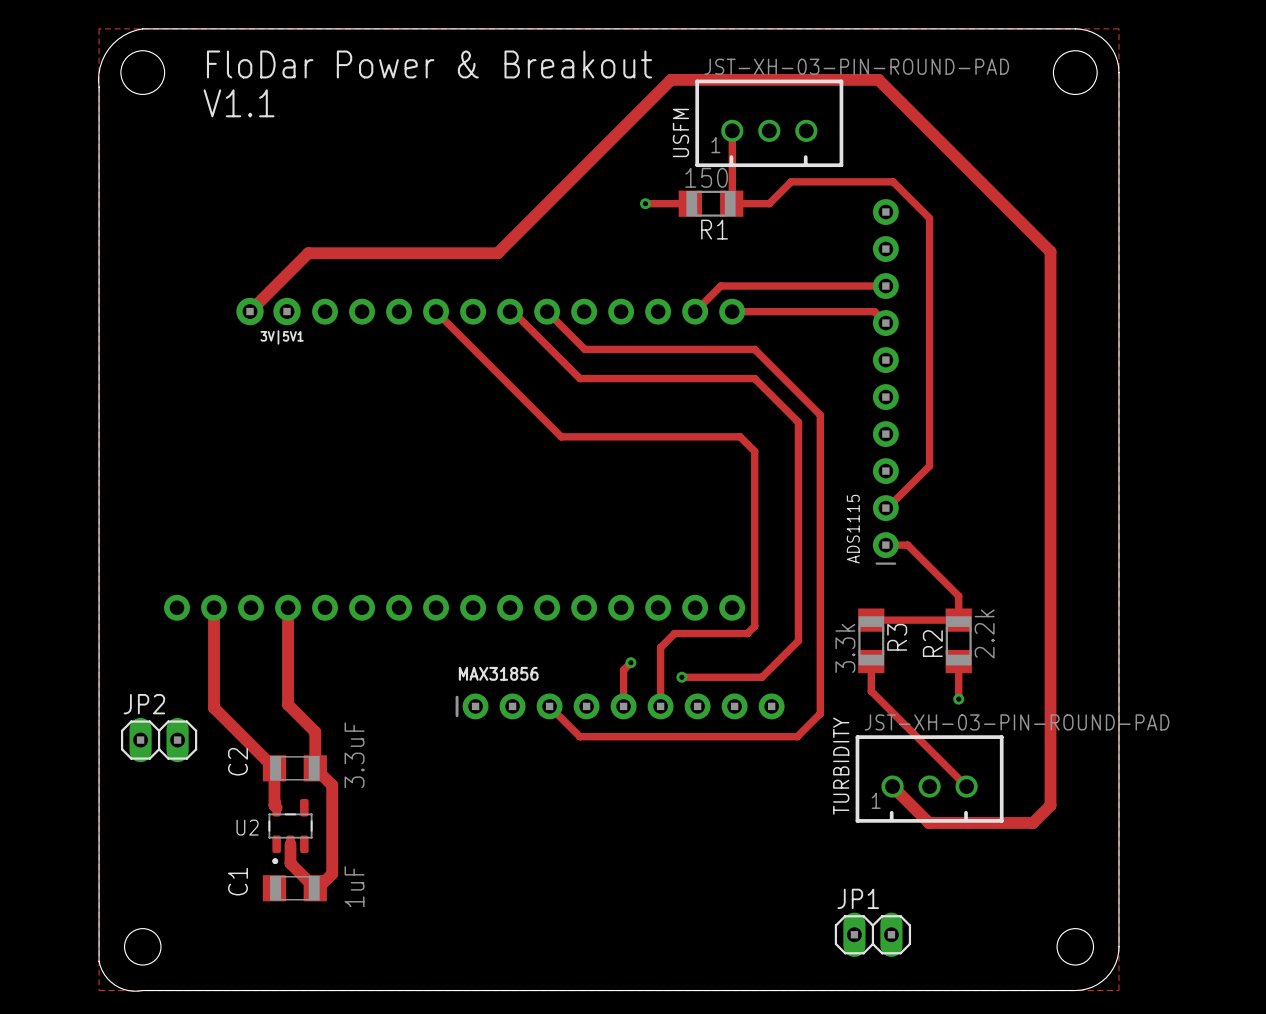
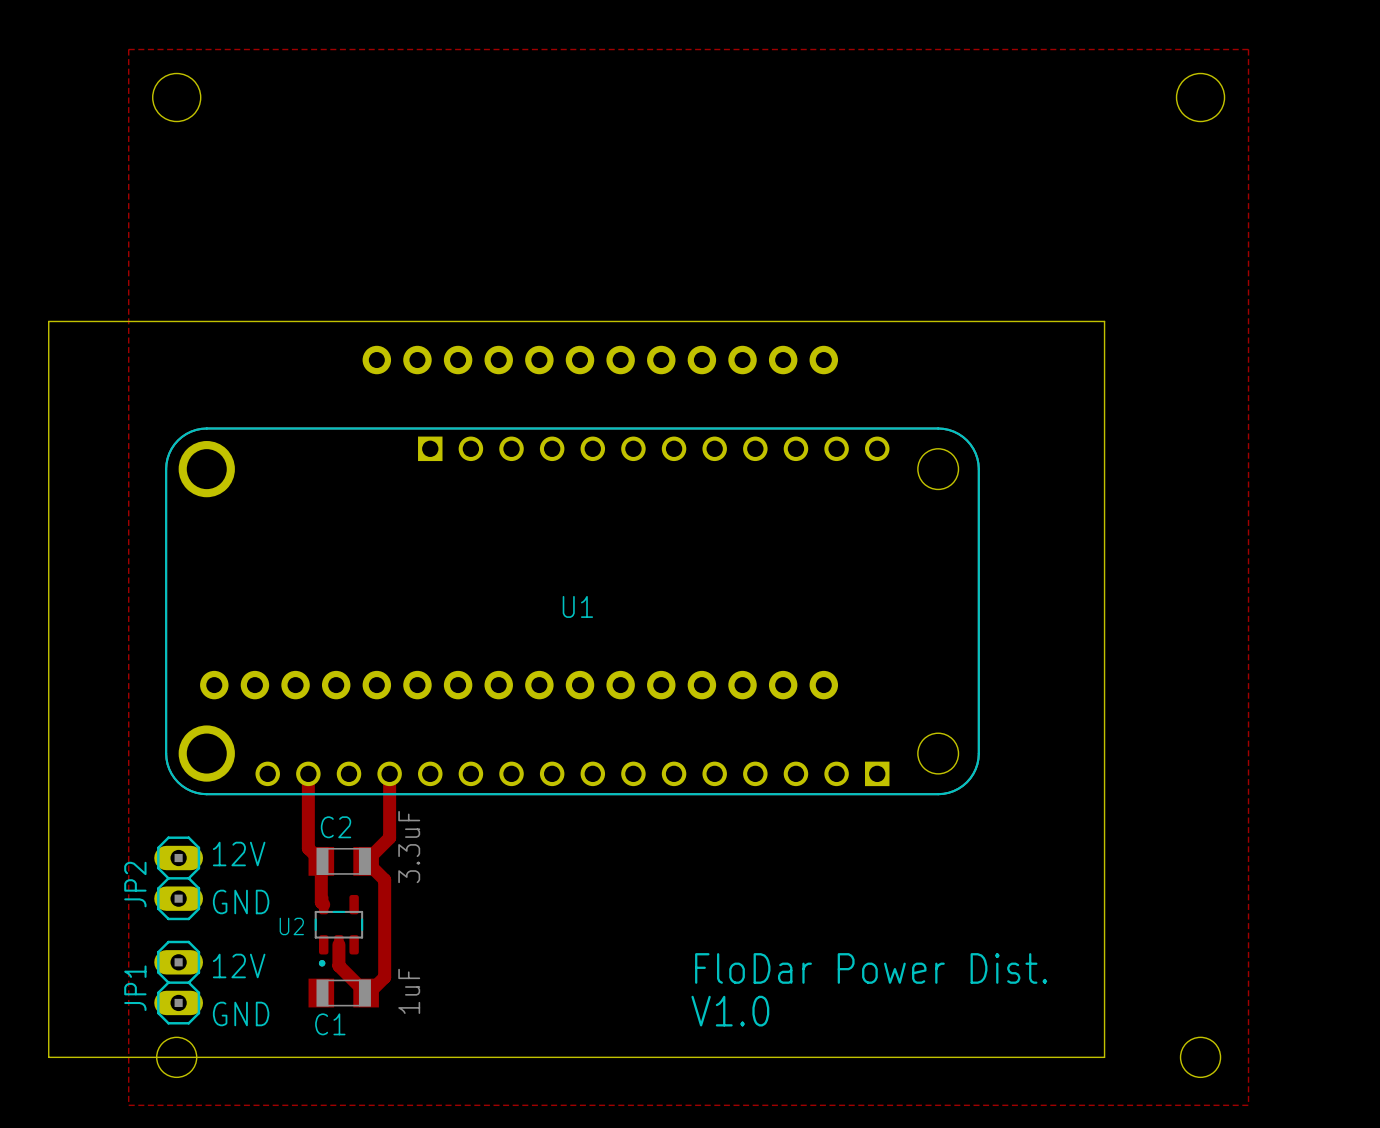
board edge: (142, 28) (1075, 28) (1092, 32) (1106, 41) (1115, 55) (1119, 72) (1119, 946) (1115, 963) (1106, 977) (1092, 987) (1075, 990) (133, 991) (123, 989) (111, 982) (104, 974) (99, 961) (98, 80) (102, 60) (113, 43) (129, 32) (142, 28) -> (48, 321) (48, 1057) (1104, 1057) (1104, 321) (48, 321)
text: FloDar Power & Breakout (429, 64) -> none
text: V1.1 (239, 103) -> none
USFM: JST-XH-03-PIN-ROUND-PAD (769, 123) -> none
track: (732, 130) (731, 203) (769, 203) (791, 181) (893, 181) (929, 218) (929, 465) (885, 508) -> none
track: (645, 203) (690, 203) -> none
via: (645, 203) -> none
R1: 150 (711, 203) -> none
track: (885, 286) (720, 286) (695, 311) -> none
track: (250, 311) (308, 253) (497, 253) (671, 79) (878, 79) (1050, 251) (1050, 805) (1033, 822) (929, 822) (892, 786) -> none
3V|5V1: (268, 311) -> none
track: (436, 311) (561, 436) (740, 436) (754, 451) (754, 626) (747, 633) (674, 633) (660, 647) (660, 706) -> none
track: (510, 311) (513, 311) (579, 378) (754, 378) (798, 422) (798, 640) (762, 677) (681, 677) -> none
track: (547, 311) (584, 349) (754, 349) (820, 414) (820, 713) (797, 736) (579, 736) (549, 706) -> none
track: (732, 311) (874, 311) (885, 323) -> none
ADS1115: (885, 381) -> none
U1: none -> (572, 611)
track: (885, 545) (907, 545) (958, 596) (958, 620) (871, 620) -> none
track: (214, 607) (214, 707) (262, 756) -> (308, 773) (308, 848)
track: (288, 607) (288, 704) (315, 731) (315, 768) -> (389, 773) (389, 837) (366, 861)
R3: 3.3k (871, 640) -> none
R2: 2.2k (958, 640) -> none
track: (871, 661) (871, 691) (966, 786) -> none
track: (958, 661) (958, 699) -> none
track: (630, 662) (623, 669) (623, 706) -> none
via: (630, 662) -> none
via: (681, 677) -> none
via: (958, 699) -> none
JP2 name position: JP2 (144, 704) -> JP2 (135, 884)
MAX31856: (620, 706) -> none
JP2 rotation: 0° (159, 740) -> 90° clockwise (178, 878)
JP2 position: (159, 740) -> (178, 878)
text: none -> 12V (239, 854)
C2 name rotation: 0° (237, 761) -> 90° clockwise (336, 827)
C2 name position: C2 (237, 761) -> C2 (336, 827)
TURBIDITY: JST-XH-03-PIN-ROUND-PAD (929, 779) -> none
text: none -> GND (241, 901)
text: none -> 12V (239, 965)
text: none -> FloDar Power Dist. (871, 968)
C1 name rotation: 0° (237, 881) -> 90° clockwise (330, 1024)
C1 name position: C1 (237, 881) -> C1 (330, 1024)
JP1 name position: JP1 (858, 898) -> JP1 (135, 988)
text: none -> V1.0 (730, 1011)
text: none -> GND (241, 1013)
JP1 rotation: 0° (872, 934) -> 90° clockwise (178, 982)
JP1 position: (872, 934) -> (178, 982)

